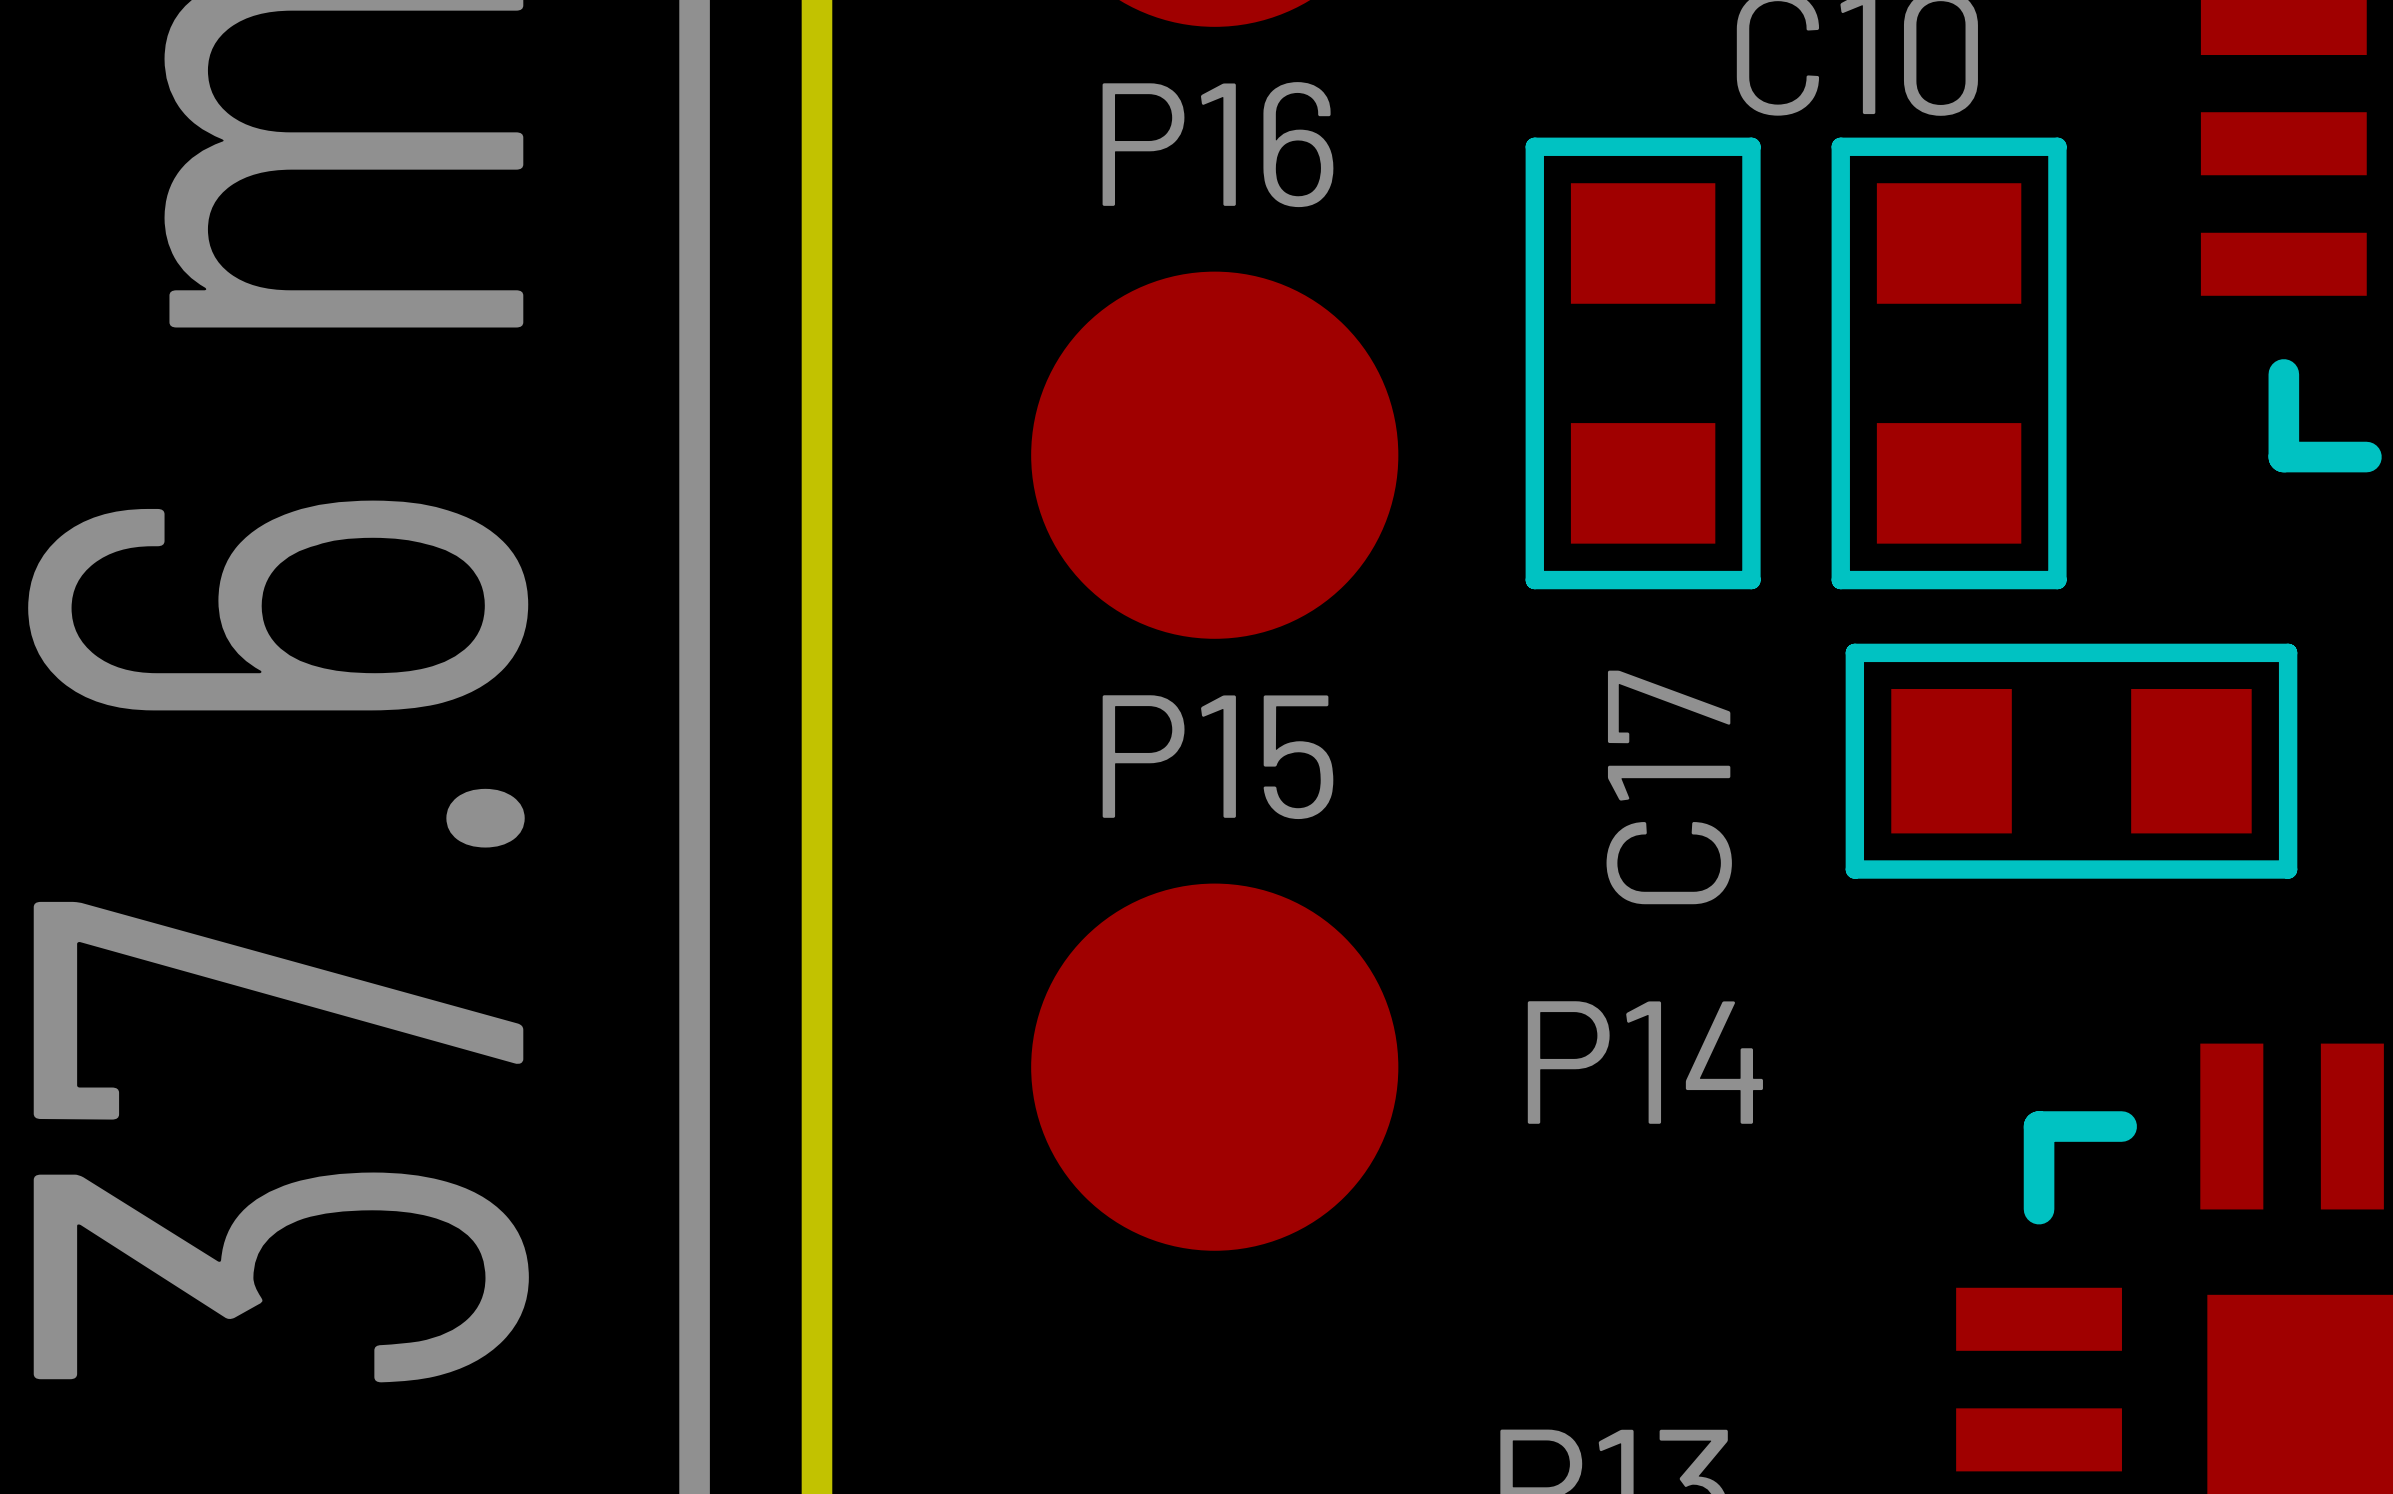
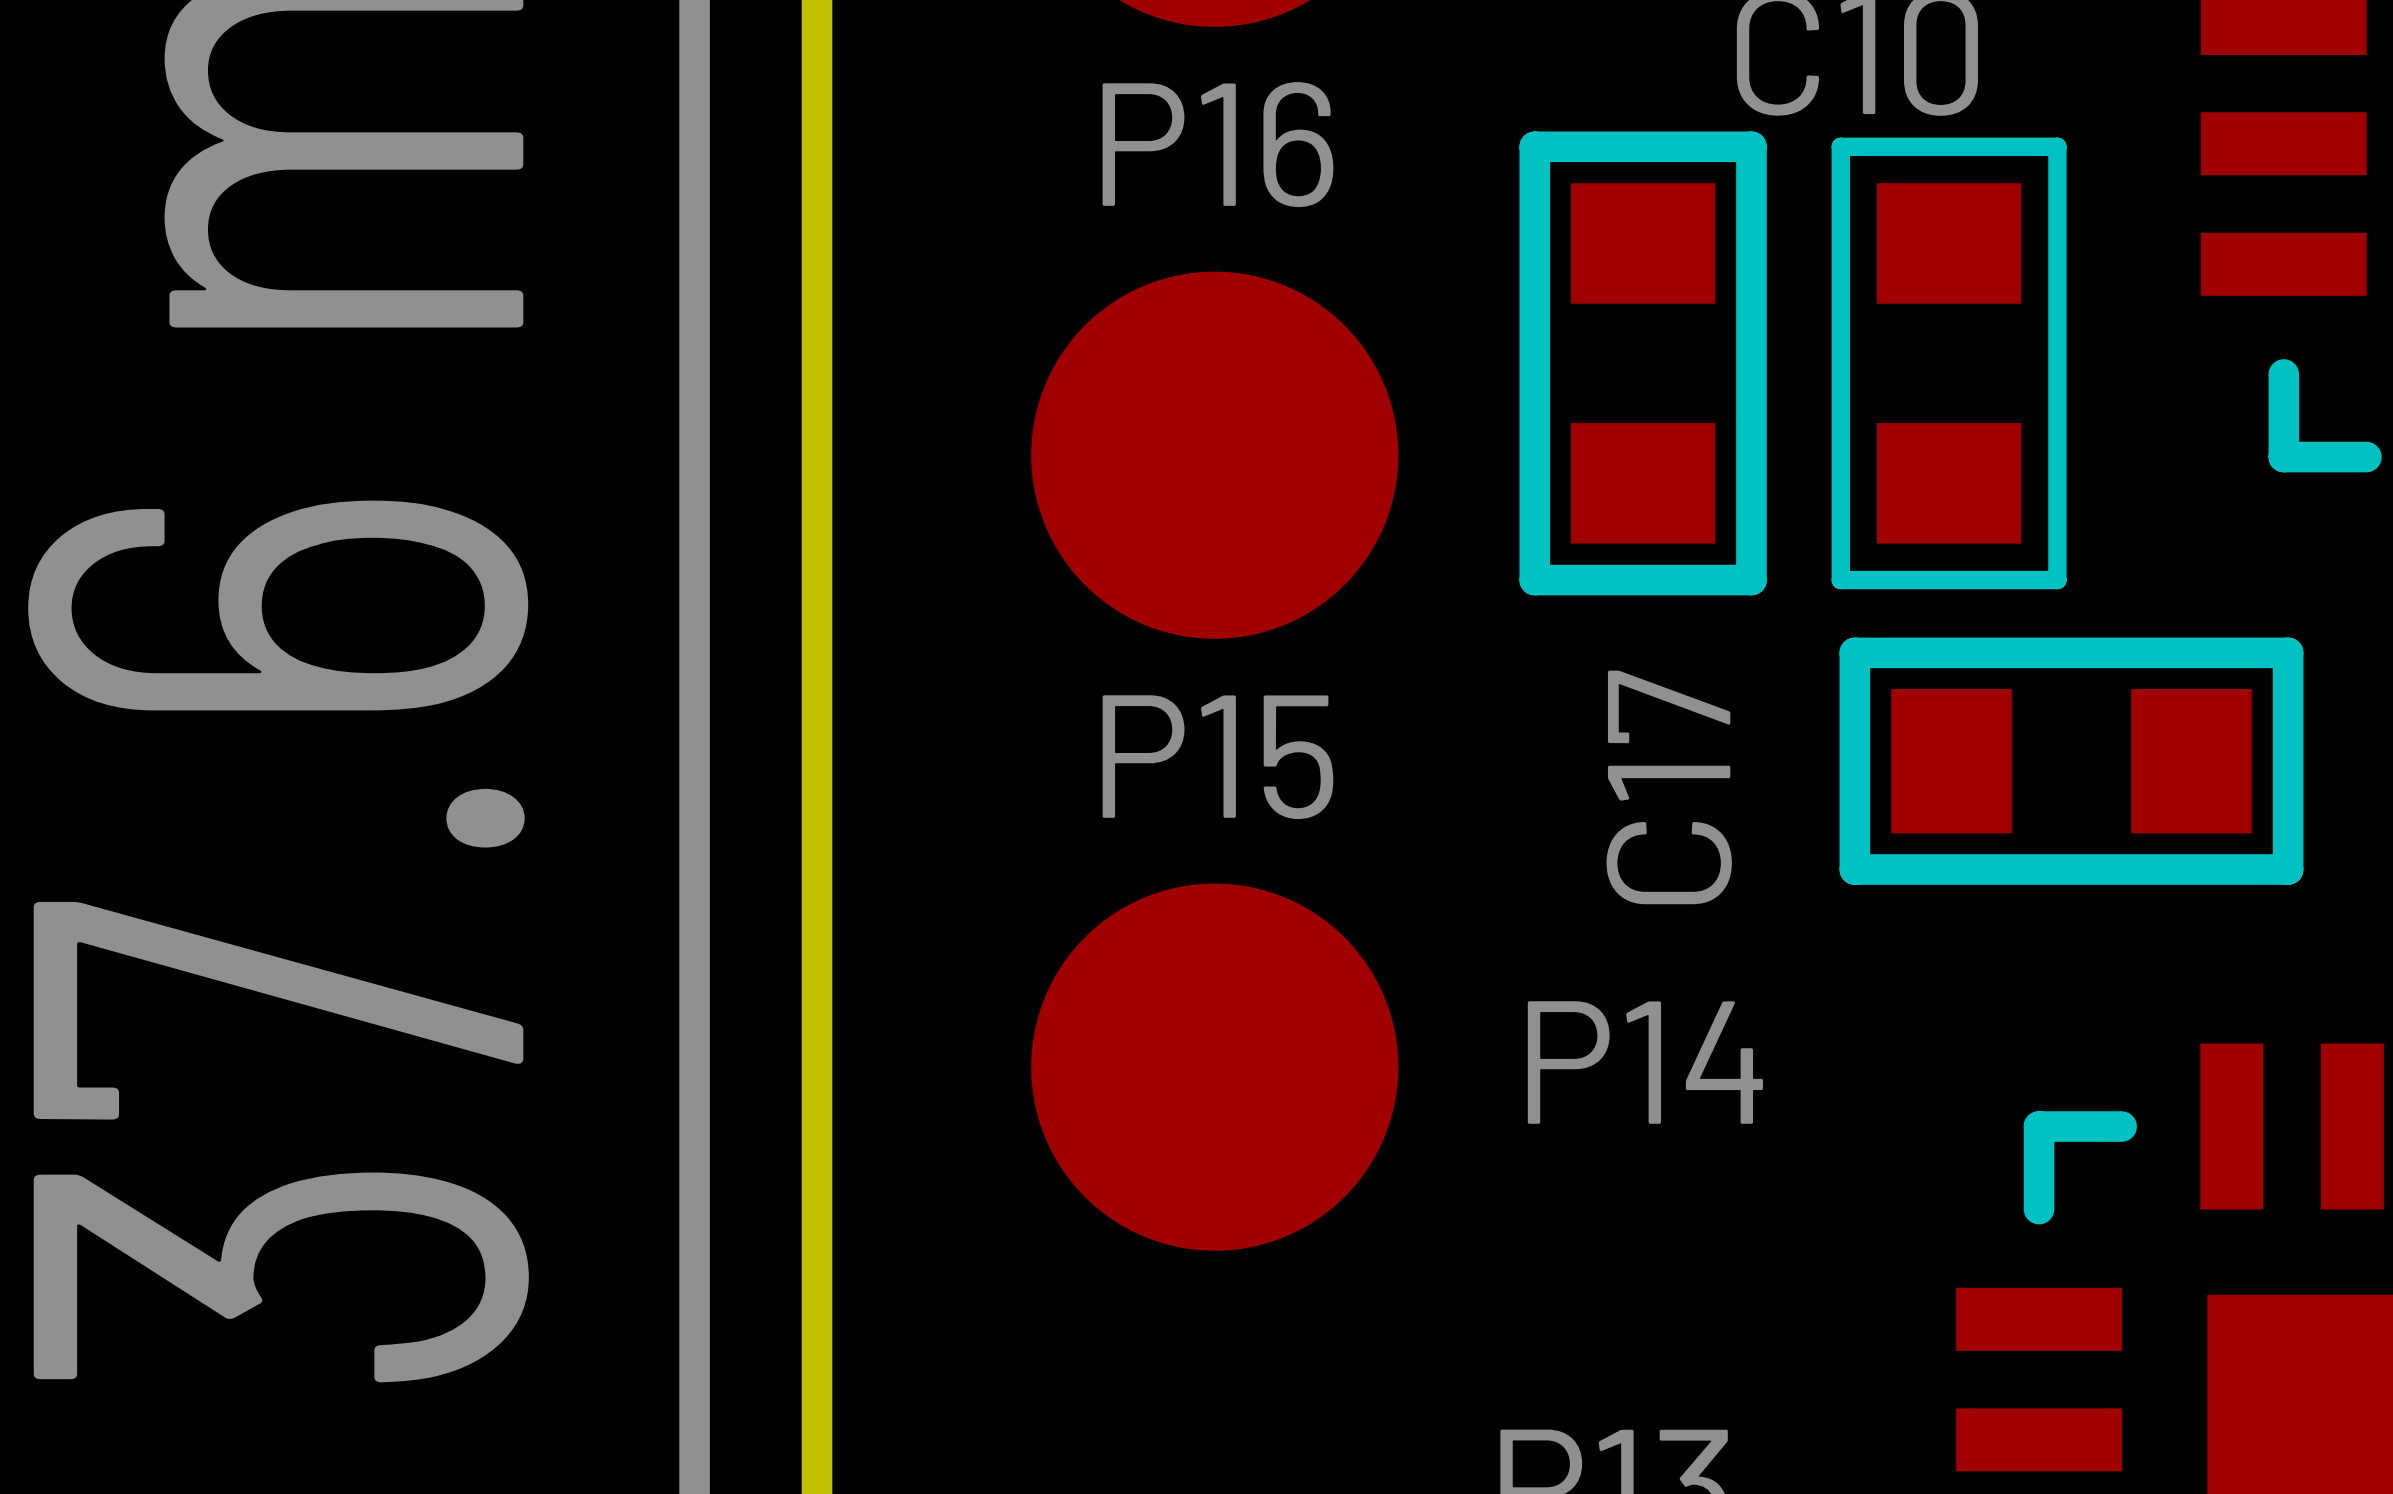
C17 footprint: [1525, 137, 1761, 590] -> [1519, 131, 1767, 596]
part footprint: [1845, 643, 2298, 879] -> [1839, 637, 2304, 885]

